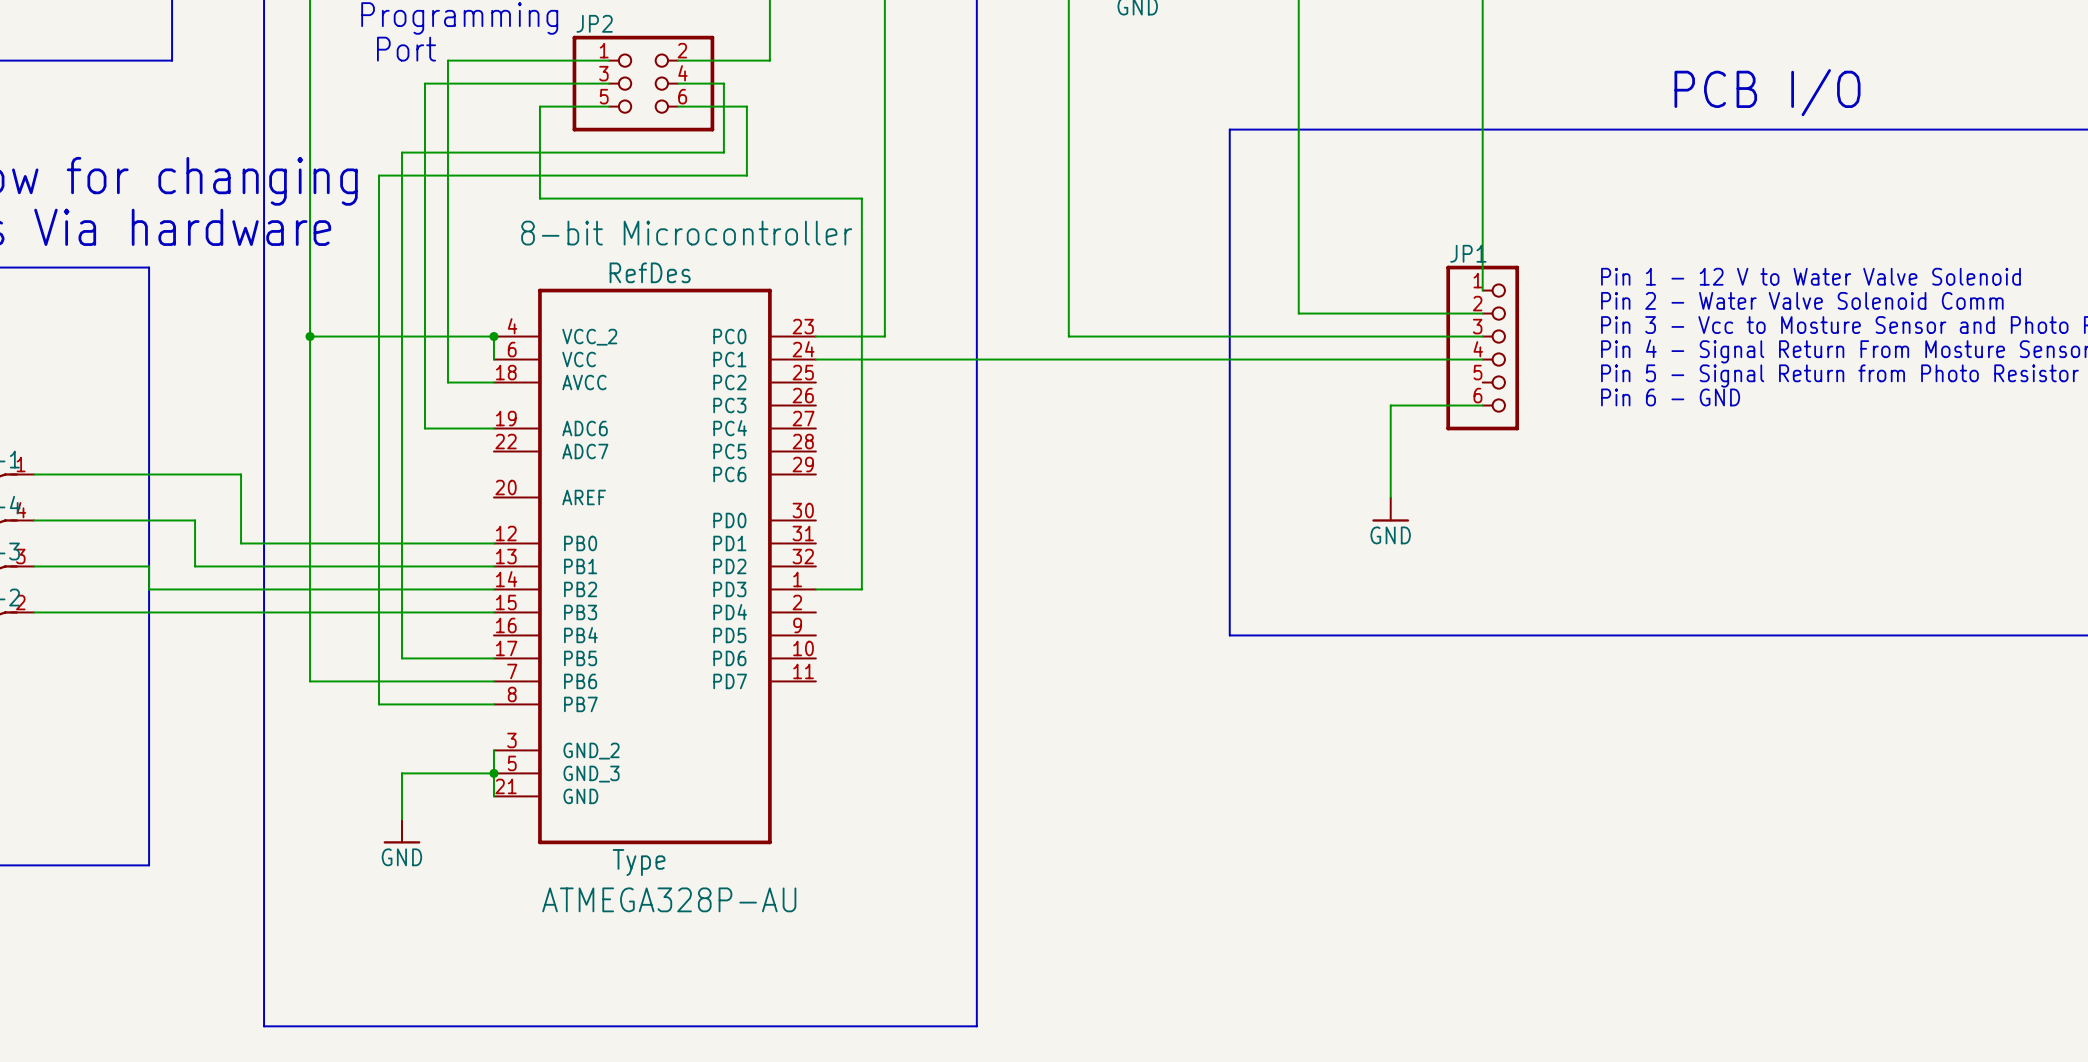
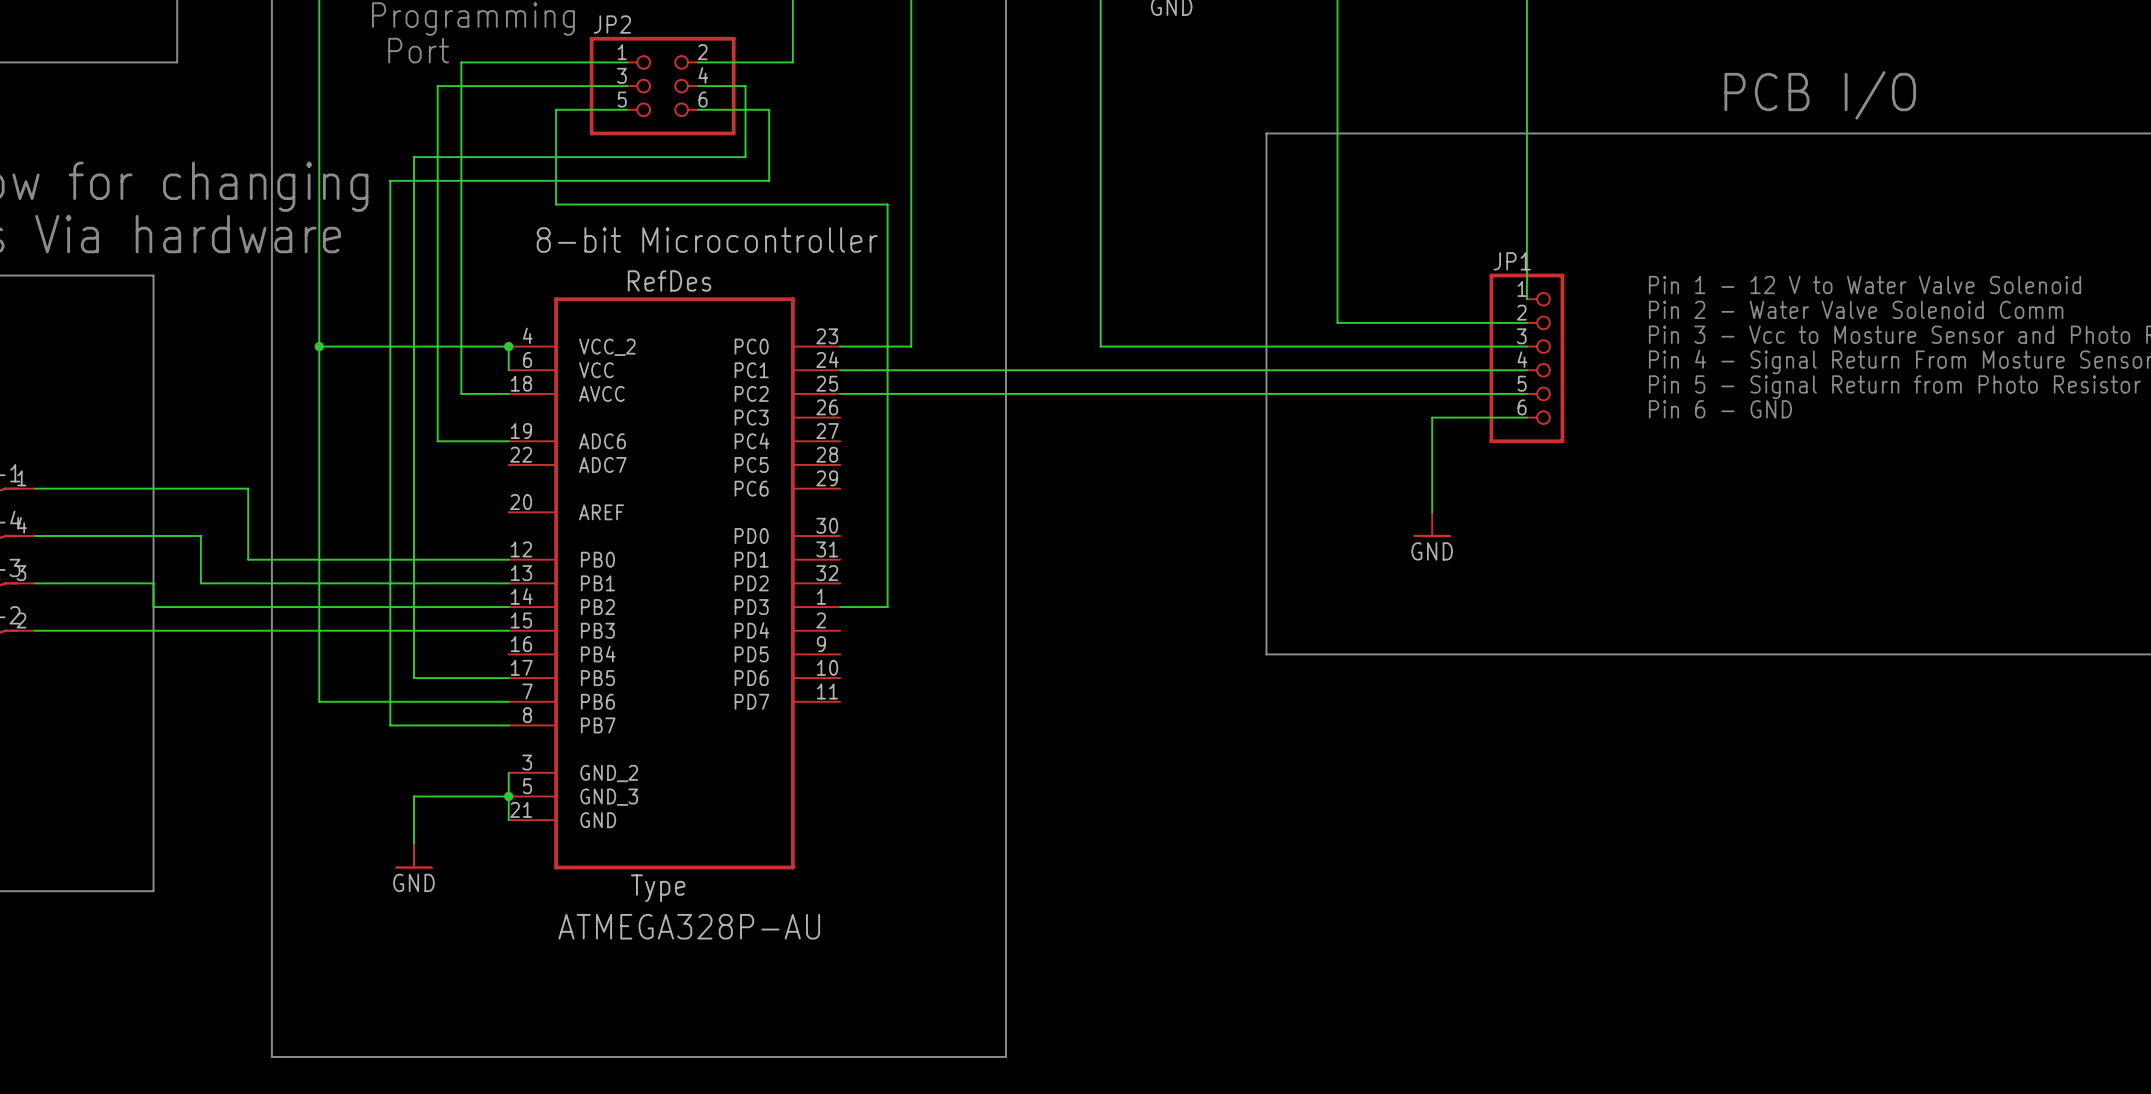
wire: none -> (840, 393) (1526, 393)

